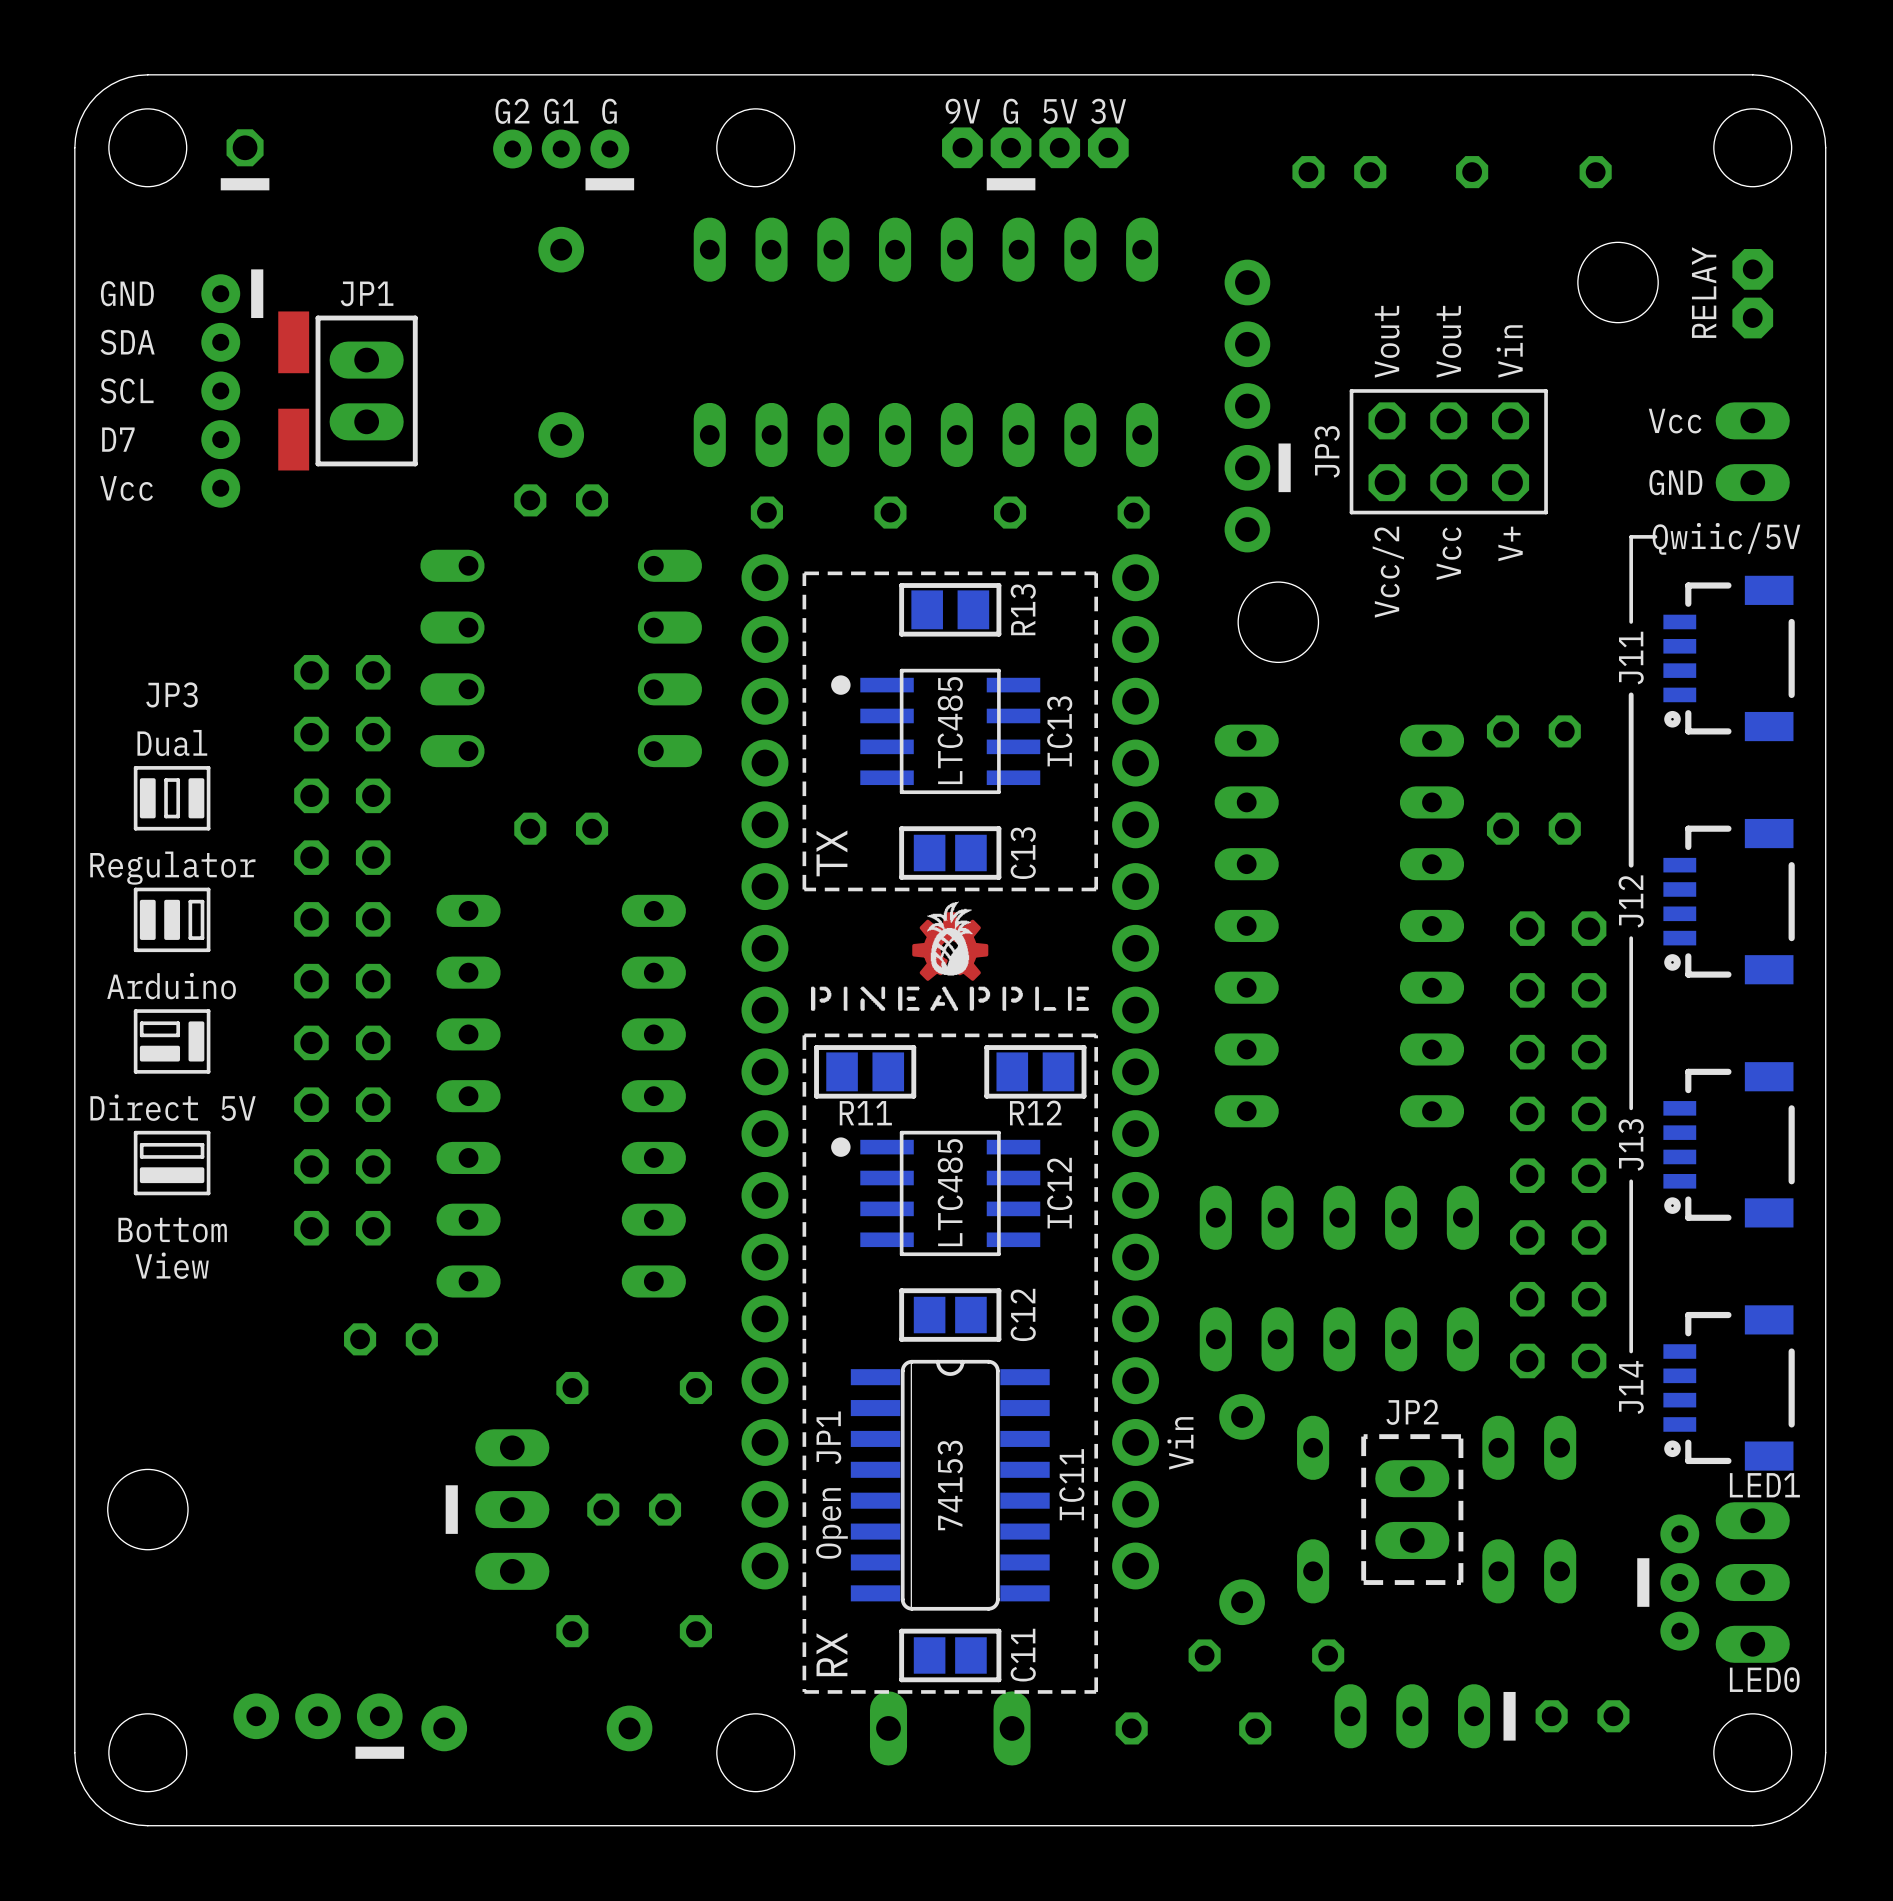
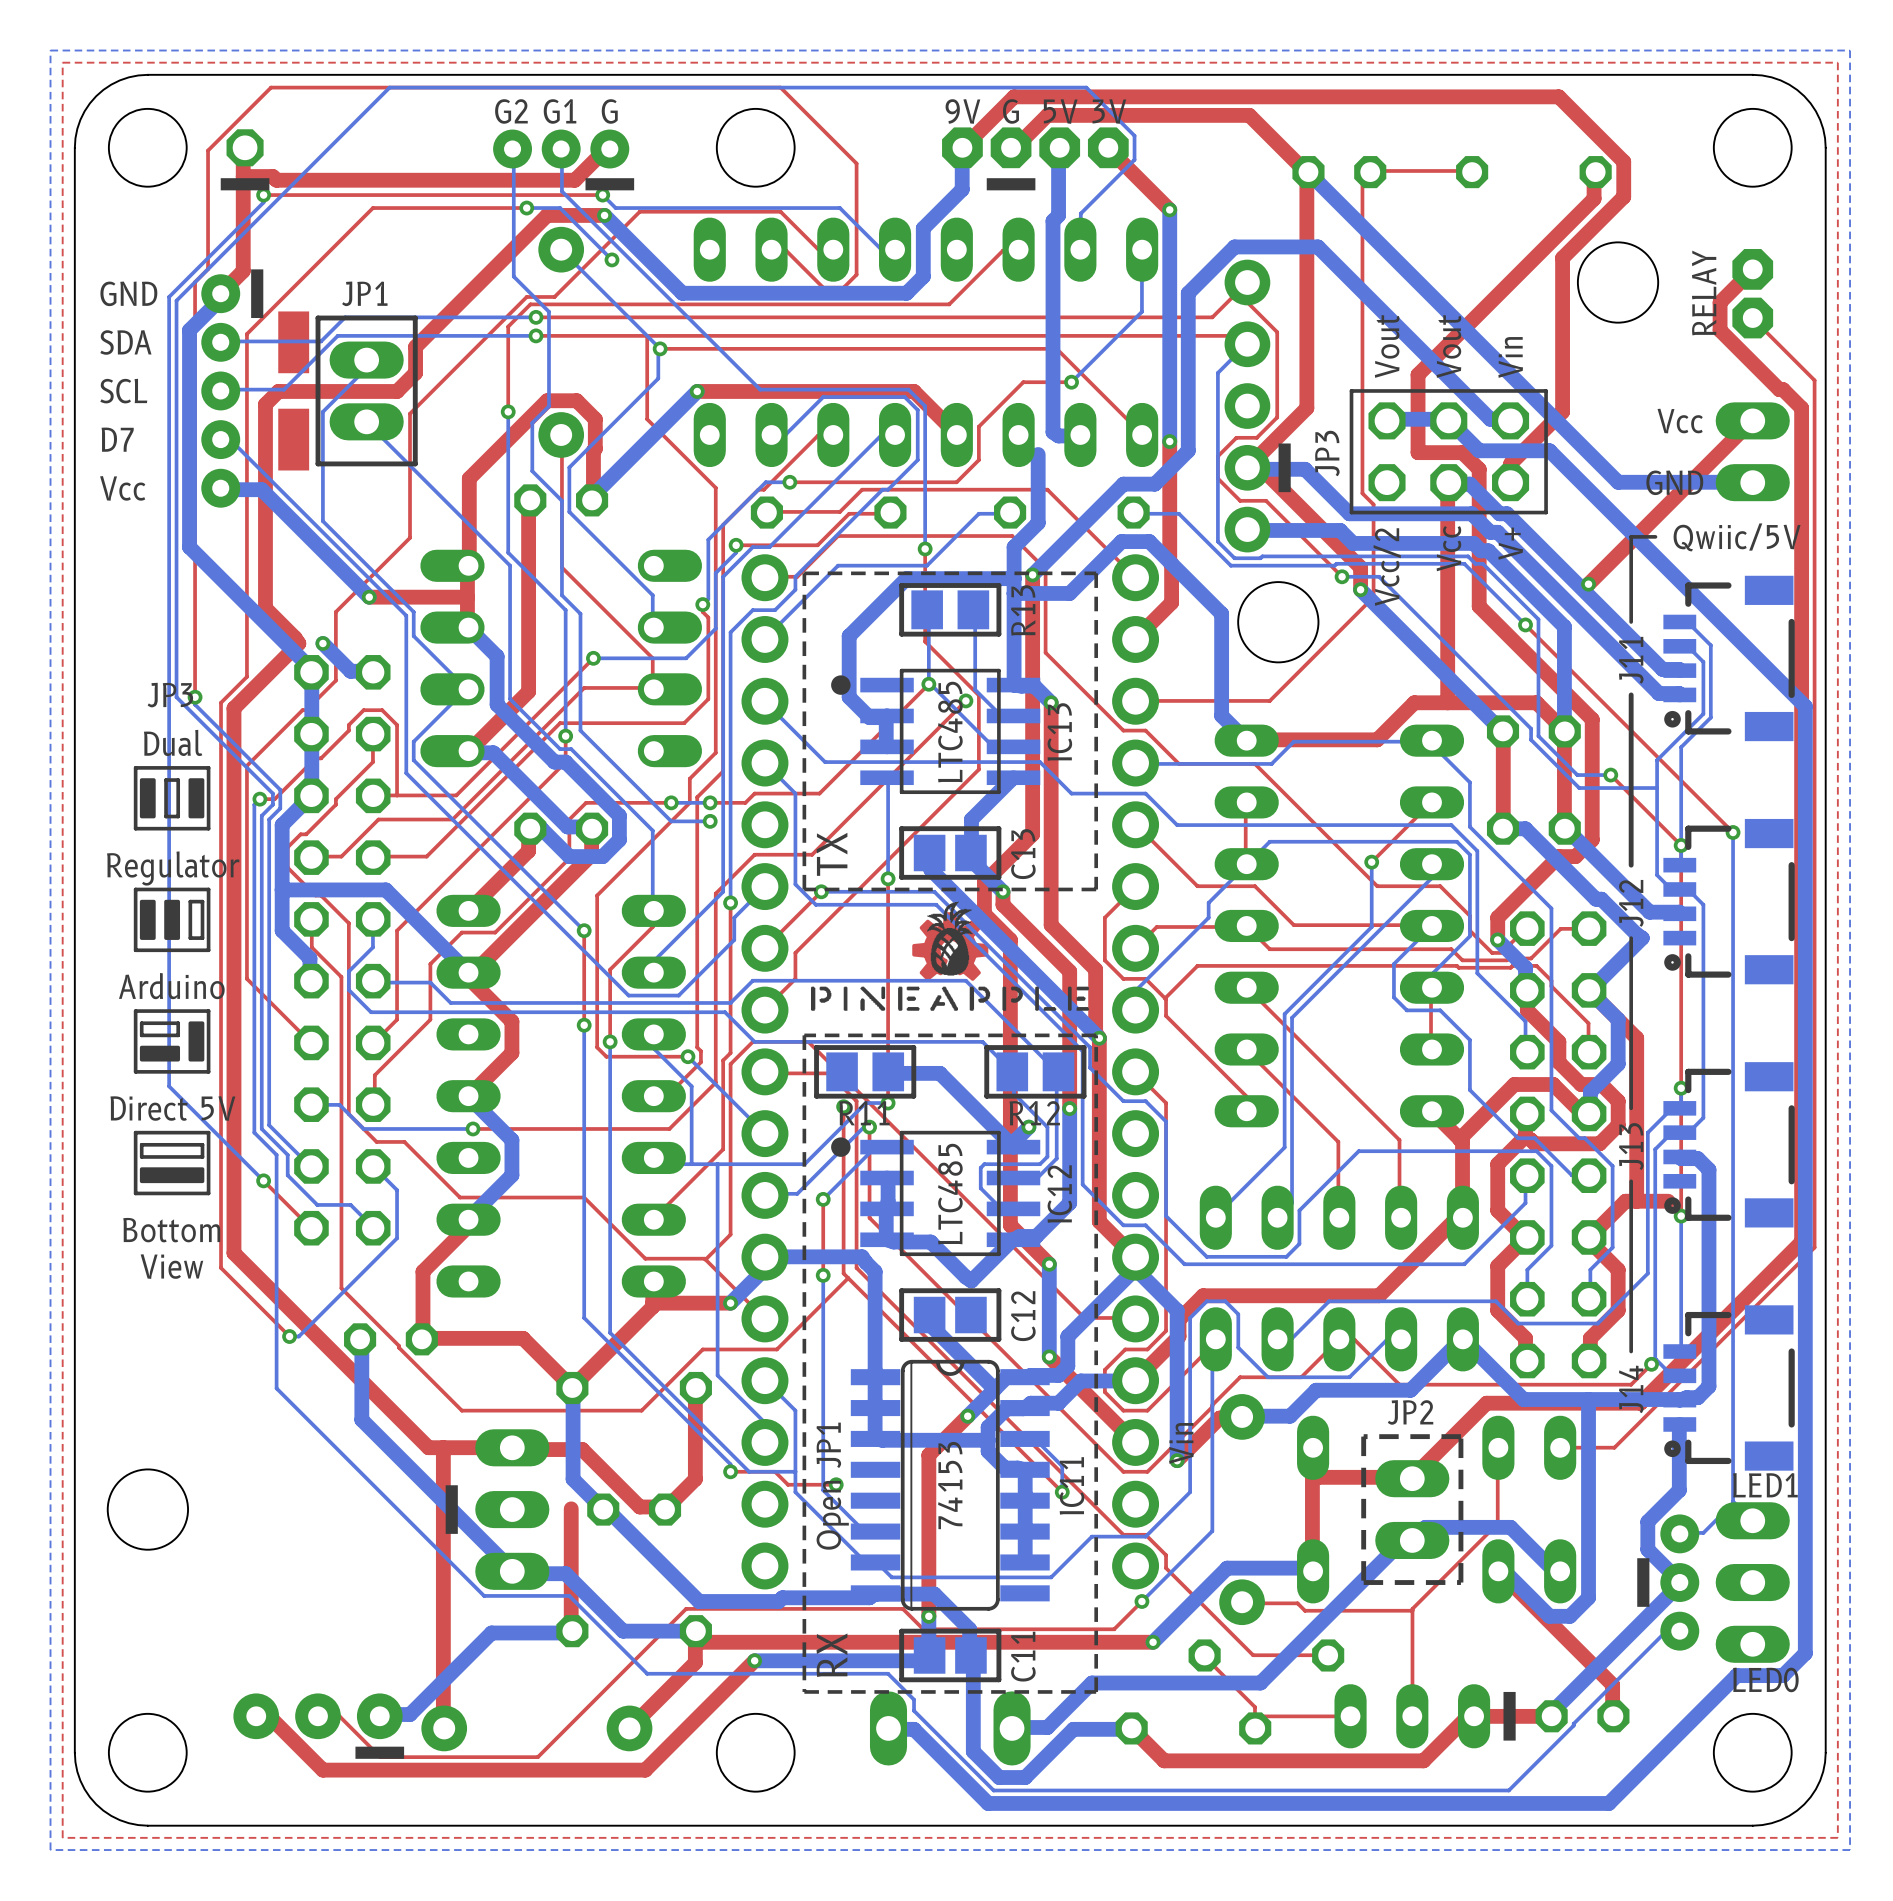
bottom zone outline: none -> (1850, 50) (50, 50) (50, 1850) (1850, 1850) (1850, 50)
top zone outline: none -> (1837, 62) (62, 62) (62, 1837) (1837, 1837) (1837, 62)
top track: none -> (245, 147) (243, 148) (243, 271) (220, 293)
bottom track: none -> (962, 147) (962, 189) (923, 228) (923, 276) (906, 293) (682, 293) (604, 215)
top track: none -> (962, 147) (1014, 96) (1558, 96) (1623, 161) (1623, 196) (1562, 258) (1562, 411) (1510, 463) (1510, 482)
top track: none -> (1011, 147) (1015, 146) (1047, 115) (1249, 115) (1308, 172) (1306, 172) (1306, 408) (1247, 467)
bottom track: none -> (1059, 147) (1058, 215) (1053, 221) (1053, 432) (1058, 435) (1080, 434)
top track: none -> (1108, 147) (1169, 209)
bottom track: none -> (512, 149) (513, 276) (548, 311) (548, 406) (532, 422) (532, 471) (561, 500) (561, 595) (580, 613) (580, 730) (671, 821) (710, 821)
bottom track: none -> (561, 149) (561, 191) (760, 389) (908, 389) (925, 406) (925, 548)
top track: none -> (609, 149) (604, 150) (574, 180) (276, 180) (272, 176) (243, 176)
bottom track: none -> (1308, 172) (1618, 482) (1752, 482)
top track: none -> (1472, 172) (1371, 170) (1362, 180) (1362, 493) (1373, 504) (1373, 597) (1269, 700) (1135, 701)
top track: none -> (1595, 172) (1594, 172) (1594, 198) (1418, 374) (1418, 452) (1462, 452) (1479, 469) (1479, 606) (1592, 719) (1592, 839) (1575, 856) (1558, 856) (1497, 917) (1497, 939)
bottom track: none -> (263, 195) (263, 202) (169, 296) (169, 1086) (263, 1180)
via: none -> (263, 195)
bottom track: none -> (602, 195) (615, 208) (839, 208) (880, 248) (895, 249)
top track: none -> (602, 195) (263, 195)
via: none -> (602, 195)
bottom track: none -> (526, 208) (560, 208) (611, 259)
top track: none -> (526, 208) (372, 208) (246, 334) (246, 676) (221, 702) (221, 1267) (289, 1336)
via: none -> (526, 208)
bottom track: none -> (1169, 209) (1169, 441)
via: none -> (1169, 209)
top track: none -> (604, 215) (547, 215) (415, 347) (415, 372) (397, 391) (278, 391) (265, 404) (265, 608) (298, 643) (233, 708) (233, 1253) (428, 1447) (511, 1447)
via: none -> (604, 215)
bottom track: none -> (561, 249) (660, 348) (658, 348) (658, 378) (569, 467) (569, 511) (652, 595) (653, 627)
top track: none -> (771, 249) (786, 250) (823, 287) (843, 287) (856, 274) (856, 163) (780, 87) (271, 87) (208, 150) (208, 269) (195, 282) (195, 697)
top track: none -> (833, 249) (817, 248) (780, 211) (639, 211) (554, 296) (526, 296) (410, 413) (410, 537) (335, 611) (335, 680) (306, 710) (302, 710) (246, 765) (246, 978) (311, 1042)
top track: none -> (1018, 249) (1002, 250) (949, 304) (530, 304) (508, 326) (508, 411)
bottom track: none -> (1080, 249) (1080, 213) (1134, 159) (1134, 135) (1086, 87) (389, 87) (176, 300) (176, 697) (272, 793) (272, 804) (261, 815) (261, 1128) (287, 1154) (287, 1175) (317, 1204) (350, 1204) (373, 1228)
bottom track: none -> (1142, 249) (1141, 311) (1071, 382)
via: none -> (611, 259)
top track: none -> (1752, 269) (1720, 302) (1720, 330) (1779, 389) (1783, 389) (1801, 408) (1801, 1242) (1640, 1403) (1486, 1403) (1412, 1478) (1317, 1477) (1313, 1447) (1313, 1571)
bottom track: none -> (220, 293) (219, 300) (189, 330) (189, 547) (308, 665) (311, 673) (311, 734)
bottom track: none -> (536, 317) (345, 317) (321, 341) (220, 342)
top track: none -> (536, 317) (1212, 317) (1247, 282) (1238, 293) (1277, 332) (1277, 417) (1256, 437) (1236, 437) (1217, 456) (1217, 478) (1240, 500) (1266, 500) (1342, 576)
via: none -> (536, 317)
top track: none -> (1752, 318) (1814, 380) (1814, 1247) (1614, 1447) (1560, 1447)
bottom track: none -> (536, 335) (337, 335) (284, 389) (220, 390)
top track: none -> (536, 335) (1238, 335) (1247, 344)
via: none -> (536, 335)
top track: none -> (647, 335) (647, 419) (715, 487) (715, 752) (689, 778) (689, 802) (597, 895) (597, 1047) (606, 1056) (687, 1056)
bottom track: none -> (1247, 344) (1217, 372) (1217, 541) (1234, 558) (1260, 558) (1262, 556) (1468, 556) (1475, 563) (1482, 563) (1538, 619) (1538, 736) (1577, 775) (1610, 775)
top track: none -> (660, 348) (1056, 348) (1142, 434)
via: none -> (660, 348)
bottom track: none -> (366, 360) (365, 369) (322, 411) (322, 521) (413, 611) (413, 636) (465, 687) (468, 689) (467, 687) (413, 741) (413, 760) (584, 930)
top track: none -> (1071, 382) (1023, 382) (978, 426) (978, 460) (956, 482) (789, 482)
via: none -> (1071, 382)
bottom track: none -> (697, 391) (593, 495) (592, 500)
top track: none -> (697, 391) (914, 391) (956, 434)
via: none -> (697, 391)
bottom track: none -> (508, 411) (508, 552) (565, 610) (565, 736)
via: none -> (508, 411)
bottom track: none -> (1387, 420) (1388, 419) (1448, 420) (1479, 450) (1549, 450) (1805, 706) (1805, 1653) (1783, 1675) (1736, 1675) (1608, 1803) (988, 1803) (914, 1729) (888, 1728)
bottom track: none -> (1510, 420) (1490, 419) (1317, 246) (1234, 246) (1188, 293) (1188, 450) (1154, 484) (1123, 484) (1032, 574)
top track: none -> (1752, 420) (1588, 584)
bottom track: none -> (366, 421) (510, 565) (510, 699) (560, 749) (571, 749) (652, 830) (653, 910)
top track: none -> (561, 434) (561, 567) (652, 658) (653, 689) (584, 687) (452, 819) (378, 819) (341, 856) (311, 857)
bottom track: none -> (771, 434) (786, 434) (823, 397) (904, 397) (917, 410) (917, 460) (888, 489) (882, 489) (795, 576) (795, 589) (775, 610) (752, 610) (730, 632) (730, 902)
top track: none -> (833, 434) (817, 435) (763, 489) (758, 489) (723, 524) (723, 771) (697, 797) (697, 1047) (700, 1051) (700, 1062) (667, 1095) (653, 1096)
bottom track: none -> (895, 434) (880, 435) (769, 547) (752, 547) (723, 576) (723, 891) (654, 960) (653, 972)
bottom track: none -> (221, 439) (230, 439) (406, 615) (406, 773) (628, 995) (678, 995) (734, 939) (734, 917) (764, 886)
top track: none -> (1169, 441) (1171, 602) (1135, 639)
via: none -> (1169, 441)
bottom track: none -> (1038, 454) (1038, 523) (1014, 547) (1013, 685) (1034, 686) (1051, 702)
bottom track: none -> (1247, 467) (1305, 469) (1349, 513) (1471, 513) (1490, 532) (1497, 532) (1658, 693) (1679, 694)
top track: none -> (1247, 467) (1258, 465) (1360, 567) (1360, 589)
bottom track: none -> (789, 482) (765, 482) (708, 539) (708, 599) (702, 604)
via: none -> (789, 482)
bottom track: none -> (1448, 482) (1469, 484) (1499, 513) (1506, 513) (1662, 669) (1679, 670)
top track: none -> (1448, 482) (1447, 702)
bottom track: none -> (220, 488) (261, 489) (369, 597)
top track: none -> (530, 500) (528, 500) (528, 691) (468, 751)
top track: none -> (592, 500) (595, 419) (576, 400) (547, 400) (469, 478) (468, 627)
top track: none -> (766, 512) (839, 511) (862, 489) (1047, 489) (1135, 577)
top track: none -> (890, 512) (849, 513) (817, 545) (736, 545)
bottom track: none -> (1010, 512) (978, 513) (927, 565) (838, 565) (764, 639)
bottom track: none -> (1133, 512) (1179, 513) (1230, 565) (1464, 563) (1525, 624)
bottom track: none -> (1247, 529) (1340, 530) (1353, 543) (1473, 543) (1481, 550) (1488, 550) (1564, 626) (1564, 731)
bottom track: none -> (736, 545) (736, 552) (715, 573) (715, 628) (686, 658) (593, 658)
via: none -> (736, 545)
top track: none -> (925, 548) (925, 641) (978, 695) (978, 769) (795, 952) (795, 978) (764, 1010)
via: none -> (925, 548)
top track: none -> (1032, 574) (1032, 834) (984, 882) (984, 914) (1010, 939) (1010, 1225) (1049, 1264)
via: none -> (1032, 574)
bottom track: none -> (1342, 576) (1379, 576) (1531, 728) (1531, 739) (1579, 788) (1657, 788)
via: none -> (1342, 576)
top track: none -> (764, 577) (797, 576) (838, 536) (1012, 536) (1045, 569) (1045, 652) (1123, 730) (1145, 730) (1179, 763) (1254, 763) (1377, 886) (1440, 886) (1469, 915) (1469, 930) (1492, 952) (1503, 952) (1527, 928)
bottom track: none -> (1014, 578) (906, 578) (849, 636) (849, 697) (869, 717) (887, 715) (887, 746)
via: none -> (1588, 584)
bottom track: none -> (1360, 589) (1503, 731)
via: none -> (1360, 589)
bottom track: none -> (1014, 593) (1069, 593) (1121, 541) (1149, 541) (1221, 613) (1221, 715) (1246, 740)
via: none -> (369, 597)
top track: none -> (467, 597) (369, 597)
top track: none -> (702, 604) (702, 611) (708, 617) (708, 699) (684, 723) (560, 723) (426, 856) (373, 857)
via: none -> (702, 604)
bottom track: none -> (927, 609) (928, 610) (928, 682) (991, 745) (1013, 746)
bottom track: none -> (973, 609) (975, 610) (975, 689) (1001, 715) (1013, 715)
bottom track: none -> (1679, 621) (1688, 623) (1710, 645) (1710, 717) (1681, 747) (1679, 865)
top track: none -> (1525, 624) (1733, 832)
via: none -> (1525, 624)
bottom track: none -> (468, 627) (497, 656) (497, 704) (554, 762) (565, 762) (619, 815) (619, 839) (602, 856) (569, 856) (541, 828) (530, 828)
bottom track: none -> (322, 643) (350, 671) (373, 672)
via: none -> (322, 643)
bottom track: none -> (1679, 646) (1688, 647) (1703, 662) (1703, 713) (1657, 760) (1657, 875) (1670, 888) (1688, 889) (1703, 904) (1703, 1117) (1690, 1130) (1681, 1130) (1679, 1132)
top track: none -> (593, 658) (456, 795) (373, 795)
via: none -> (593, 658)
top track: none -> (928, 684) (819, 793) (754, 793) (745, 802) (710, 802)
via: none -> (928, 684)
bottom track: none -> (195, 697) (195, 704) (280, 789) (280, 808) (269, 819) (269, 1125) (311, 1166)
via: none -> (195, 697)
top track: none -> (965, 700) (812, 854) (754, 854) (715, 893) (715, 1082) (669, 1128) (473, 1128)
via: none -> (965, 700)
bottom track: none -> (764, 701) (825, 762) (1040, 762) (1071, 793) (1145, 793) (1177, 825) (1451, 825) (1477, 851) (1477, 973) (1525, 1021) (1525, 1051) (1527, 1052)
top track: none -> (1051, 702) (1051, 925) (1095, 969) (1095, 1032) (1099, 1038) (1099, 1221) (1135, 1257)
via: none -> (1051, 702)
top track: none -> (1503, 731) (1503, 828)
bottom track: none -> (311, 734) (311, 795) (282, 825) (282, 930) (309, 958) (311, 981)
top track: none -> (372, 734) (372, 762) (335, 799) (335, 804) (306, 834) (300, 834) (287, 847) (287, 867) (315, 895) (321, 895) (348, 923) (348, 1114) (376, 1141) (404, 1141) (460, 1197) (584, 1197) (645, 1258) (704, 1258) (764, 1318)
top track: none -> (565, 736) (565, 762) (397, 930) (397, 1019) (373, 1042)
via: none -> (565, 736)
top track: none -> (1246, 740) (1377, 739) (1414, 702) (1536, 702) (1564, 731) (1564, 828)
bottom track: none -> (468, 751) (469, 752) (493, 752) (567, 826) (591, 826) (592, 828)
bottom track: none -> (764, 763) (795, 793) (795, 884) (815, 904) (936, 904) (1082, 1051) (1082, 1184) (1123, 1225) (1145, 1225) (1184, 1264) (1464, 1264) (1525, 1203) (1525, 1177) (1527, 1175)
bottom track: none -> (1135, 763) (1271, 763) (1293, 741) (1432, 740) (1431, 743) (1469, 782) (1469, 826) (1551, 908) (1551, 1110) (1579, 1138) (1584, 1138) (1612, 1166) (1612, 1247) (1590, 1269) (1589, 1299)
top track: none -> (1610, 775) (1681, 845) (1681, 1216)
via: none -> (1610, 775)
bottom track: none -> (887, 777) (888, 878)
bottom track: none -> (1013, 777) (971, 819) (971, 860) (1002, 891)
top track: none -> (397, 795) (397, 725) (382, 710) (363, 710) (348, 725) (348, 730) (321, 758) (315, 758) (274, 799) (259, 799)
bottom track: none -> (259, 799) (254, 804) (254, 1132) (276, 1154) (276, 1388) (484, 1595) (569, 1595) (647, 1673) (888, 1673) (914, 1699) (914, 1710) (993, 1790) (1508, 1790) (1664, 1632) (1679, 1632) (1679, 1631)
via: none -> (259, 799)
top track: none -> (671, 802) (586, 802) (569, 819) (569, 858) (495, 932) (461, 932) (430, 964) (430, 1019) (374, 1075) (373, 1104)
via: none -> (671, 802)
bottom track: none -> (710, 802) (671, 802)
via: none -> (710, 802)
top track: none -> (1246, 802) (1246, 864)
top track: none -> (1432, 802) (1371, 862)
via: none -> (710, 821)
top track: none -> (1135, 824) (1197, 886) (1254, 886) (1293, 925) (1432, 925)
top track: none -> (530, 828) (528, 828) (528, 851) (468, 910)
top track: none -> (591, 828) (591, 854) (474, 971) (468, 972) (469, 978) (511, 1021) (511, 1053) (468, 1096)
bottom track: none -> (1503, 828) (1525, 828) (1595, 899) (1601, 899) (1642, 938) (1589, 990) (1618, 1019) (1618, 1064) (1590, 1091) (1589, 1113)
bottom track: none -> (1564, 828) (1649, 912) (1679, 912) (1679, 913)
bottom track: none -> (1733, 832) (1733, 1501) (1752, 1520) (1733, 1503) (1703, 1532) (1679, 1533)
via: none -> (1733, 832)
via: none -> (1681, 845)
bottom track: none -> (929, 853) (930, 869) (1099, 1038)
bottom track: none -> (1371, 862) (1371, 927) (1284, 1014) (1284, 1147) (1215, 1217)
via: none -> (1371, 862)
bottom track: none -> (1432, 864) (1431, 878) (1292, 1017) (1292, 1203) (1277, 1217)
top track: none -> (888, 878) (888, 1103)
via: none -> (888, 878)
top track: none -> (1135, 886) (1104, 917) (1104, 960) (1123, 978) (1145, 978) (1166, 999) (1166, 1015) (1245, 1095) (1246, 1111)
bottom track: none -> (282, 889) (385, 889) (468, 972)
bottom track: none -> (821, 891) (934, 891) (1090, 1047) (1090, 1067) (1123, 1101) (1145, 1101) (1166, 1121) (1166, 1216) (1206, 1256) (1286, 1256) (1299, 1243) (1299, 1210) (1358, 1151) (1536, 1151) (1551, 1166) (1551, 1245) (1527, 1269) (1527, 1299)
top track: none -> (821, 891) (764, 948)
via: none -> (821, 891)
top track: none -> (1002, 891) (1002, 904) (1069, 971) (1069, 1108)
via: none -> (1002, 891)
top track: none -> (730, 902) (730, 1053) (723, 1060) (723, 1149) (653, 1219)
via: none -> (730, 902)
top track: none -> (653, 910) (652, 927) (610, 969) (610, 1041)
top track: none -> (311, 919) (311, 947) (341, 977) (341, 1288) (461, 1410) (641, 1410) (702, 1349) (776, 1349) (848, 1278)
bottom track: none -> (372, 919) (372, 947) (348, 971) (348, 990) (371, 1012) (725, 1012) (754, 1041) (982, 1041) (1012, 1071)
bottom track: none -> (1432, 925) (1393, 964) (1393, 997) (1406, 1010) (1440, 1010) (1469, 1040) (1469, 1090) (1518, 1138) (1534, 1138) (1571, 1175) (1589, 1175)
top track: none -> (1589, 928) (1560, 928) (1531, 958) (1508, 958) (1506, 960) (1462, 960) (1451, 949) (1269, 949) (1246, 925) (1156, 927) (1135, 948)
top track: none -> (584, 930) (584, 1025)
via: none -> (584, 930)
bottom track: none -> (1497, 939) (1525, 967) (1525, 990) (1527, 990)
via: none -> (1497, 939)
bottom track: none -> (373, 981) (430, 982) (450, 1002) (730, 1002) (752, 980) (965, 980) (1058, 1071) (1056, 1073) (1056, 1158) (1038, 1177) (1013, 1178)
top track: none -> (1246, 987) (1399, 1140) (1399, 1216) (1401, 1217)
bottom track: none -> (1432, 987) (1432, 973) (1469, 936) (1469, 854) (1456, 841) (1269, 841) (1208, 902) (1208, 917) (1136, 990) (1135, 1010)
top track: none -> (1432, 987) (1432, 1049)
top track: none -> (1527, 990) (1527, 1010) (1558, 1041) (1558, 1062) (1581, 1084) (1601, 1084) (1618, 1101) (1618, 1125) (1599, 1143) (1534, 1143) (1525, 1136)
top track: none -> (1589, 990) (1636, 1038) (1636, 1201)
top track: none -> (1165, 998) (1197, 965) (1456, 965) (1458, 967) (1536, 965) (1551, 980) (1551, 986) (1588, 1023) (1589, 1052)
bottom track: none -> (584, 1025) (584, 1317) (730, 1464) (730, 1471)
via: none -> (584, 1025)
bottom track: none -> (653, 1034) (654, 1049) (691, 1086) (691, 1164)
via: none -> (1099, 1038)
bottom track: none -> (610, 1041) (610, 1332) (749, 1471) (795, 1471)
via: none -> (610, 1041)
top track: none -> (1246, 1049) (1338, 1141) (1339, 1217)
bottom track: none -> (687, 1056) (764, 1133)
via: none -> (687, 1056)
top track: none -> (764, 1071) (765, 1073) (828, 1073) (856, 1101) (856, 1267) (1123, 1534) (1145, 1534) (1166, 1555) (1166, 1568) (1253, 1655) (1328, 1655)
bottom track: none -> (888, 1071) (939, 1073) (1013, 1147) (1015, 1140) (1028, 1127)
bottom track: none -> (1012, 1071) (1014, 1073) (1014, 1093) (1047, 1127) (1047, 1156) (1040, 1164) (984, 1164) (980, 1167) (980, 1188) (1001, 1208) (1013, 1208)
top track: none -> (1135, 1071) (1166, 1103) (1166, 1330) (1147, 1349) (1125, 1349) (1104, 1369) (1104, 1392) (1123, 1410) (1147, 1410) (1214, 1343) (1215, 1339)
bottom track: none -> (1681, 1088) (1681, 1106) (1671, 1108) (1647, 1132) (1647, 1273) (1597, 1323) (1518, 1323) (1495, 1301) (1329, 1301) (1292, 1338) (1277, 1339)
via: none -> (1681, 1088)
bottom track: none -> (468, 1096) (511, 1140) (511, 1175) (468, 1219)
bottom track: none -> (888, 1103) (865, 1103) (804, 1164) (660, 1164) (653, 1157)
via: none -> (888, 1103)
bottom track: none -> (311, 1104) (339, 1104) (363, 1128) (473, 1128)
top track: none -> (843, 1106) (843, 1273) (1062, 1492)
via: none -> (843, 1106)
bottom track: none -> (1069, 1108) (1069, 1203) (1036, 1236) (1019, 1236) (1012, 1240) (971, 1280) (930, 1242) (893, 1242) (887, 1239) (887, 1178)
via: none -> (1069, 1108)
top track: none -> (1432, 1111) (1462, 1141) (1462, 1217) (1453, 1221) (1379, 1295) (1203, 1295) (1179, 1319) (1179, 1336) (1135, 1380)
top track: none -> (1589, 1113) (1581, 1112) (1553, 1084) (1514, 1084) (1459, 1139)
bottom track: none -> (869, 1127) (863, 1127) (797, 1193) (765, 1193) (764, 1195)
top track: none -> (869, 1127) (869, 1217) (1123, 1471) (1147, 1471) (1240, 1377) (1301, 1377) (1339, 1339) (1355, 1340) (1399, 1384) (1631, 1384) (1651, 1364)
via: none -> (869, 1127)
via: none -> (1028, 1127)
via: none -> (473, 1128)
bottom track: none -> (1679, 1132) (1671, 1132) (1655, 1149) (1655, 1358) (1671, 1375) (1679, 1375)
top track: none -> (1525, 1136) (1497, 1164) (1497, 1210) (1527, 1237) (1497, 1266) (1497, 1310) (1525, 1338) (1525, 1360) (1527, 1360)
bottom track: none -> (887, 1147) (875, 1147) (823, 1199)
bottom track: none -> (1679, 1156) (1681, 1158) (1697, 1158) (1708, 1169) (1708, 1386) (1697, 1397) (1686, 1397) (1679, 1400) (1523, 1399) (1462, 1339) (1410, 1390) (1316, 1390) (1290, 1416) (1242, 1416)
bottom track: none -> (717, 1164) (717, 1375) (763, 1421) (764, 1442)
bottom track: none -> (373, 1166) (397, 1190) (397, 1238) (298, 1336) (289, 1336)
top track: none -> (263, 1180) (311, 1228)
via: none -> (263, 1180)
top track: none -> (823, 1199) (823, 1275)
via: none -> (823, 1199)
top track: none -> (1668, 1201) (1625, 1201) (1589, 1237) (1592, 1243) (1618, 1269) (1618, 1310) (1590, 1338) (1589, 1360)
bottom track: none -> (1681, 1216) (1679, 1351)
via: none -> (1681, 1216)
top track: none -> (468, 1219) (467, 1227) (422, 1271) (421, 1339) (523, 1338) (572, 1387) (652, 1306) (653, 1281)
top track: none -> (705, 1259) (730, 1234) (730, 1064) (752, 1041) (808, 1041) (1084, 1317) (1135, 1318)
bottom track: none -> (1049, 1264) (1049, 1356)
via: none -> (1049, 1264)
bottom track: none -> (823, 1275) (823, 1490) (863, 1531) (875, 1531)
via: none -> (823, 1275)
bottom track: none -> (730, 1303) (763, 1269) (765, 1256) (862, 1256) (875, 1271) (875, 1377)
top track: none -> (730, 1303) (652, 1303)
via: none -> (730, 1303)
bottom track: none -> (929, 1315) (930, 1325) (994, 1389)
via: none -> (289, 1336)
bottom track: none -> (360, 1339) (361, 1340) (361, 1419) (512, 1571) (519, 1573) (565, 1573) (623, 1631) (695, 1631)
bottom track: none -> (1215, 1339) (1212, 1342) (1212, 1531) (1141, 1601)
bottom track: none -> (1401, 1339) (1386, 1340) (1349, 1377) (1267, 1377) (1238, 1347) (1238, 1314) (1225, 1301) (1206, 1301) (1190, 1317) (1190, 1492) (1145, 1536) (1091, 1536) (1051, 1577) (891, 1577) (875, 1560) (863, 1560) (795, 1492) (795, 1410) (764, 1380)
top track: none -> (1049, 1356) (1135, 1442)
via: none -> (1049, 1356)
via: none -> (1651, 1364)
bottom track: none -> (875, 1377) (875, 1438) (988, 1440)
bottom track: none -> (1135, 1380) (1080, 1380) (1058, 1403) (1030, 1403) (1023, 1408) (1006, 1408) (988, 1427) (988, 1451) (1004, 1468) (1025, 1469)
bottom track: none -> (572, 1387) (573, 1479) (603, 1509) (610, 1512) (699, 1601) (778, 1601) (782, 1597) (869, 1597) (875, 1593) (934, 1594) (969, 1629) (969, 1655) (973, 1662) (973, 1751) (999, 1777) (1025, 1777) (1073, 1729) (1131, 1728)
top track: none -> (695, 1387) (695, 1479) (665, 1509) (658, 1506) (639, 1506) (582, 1449) (519, 1449) (512, 1447)
bottom track: none -> (1588, 1399) (1588, 1597) (1569, 1616) (1549, 1616) (1505, 1571) (1498, 1571)
bottom track: none -> (967, 1416) (1006, 1377) (1058, 1375) (1067, 1366) (1067, 1336) (1134, 1269) (1135, 1257) (1140, 1273) (1177, 1310) (1177, 1460)
top track: none -> (967, 1416) (928, 1455) (928, 1616)
via: none -> (967, 1416)
top track: none -> (1242, 1416) (1219, 1418) (1177, 1460)
bottom track: none -> (1679, 1424) (1679, 1490) (1647, 1521) (1647, 1549) (1679, 1582) (1553, 1710) (1551, 1716)
bottom track: none -> (1025, 1438) (1036, 1440) (1062, 1466) (1062, 1492)
top track: none -> (443, 1447) (444, 1728)
top track: none -> (1498, 1447) (1497, 1523) (1412, 1608) (1412, 1716)
via: none -> (1177, 1460)
bottom track: none -> (1025, 1469) (1025, 1562)
top track: none -> (730, 1471) (775, 1471) (788, 1484) (836, 1484)
via: none -> (730, 1471)
via: none -> (836, 1484)
via: none -> (1062, 1492)
top track: none -> (571, 1508) (572, 1631)
bottom track: none -> (1412, 1540) (1425, 1527) (1510, 1527) (1553, 1569) (1560, 1571)
bottom track: none -> (1412, 1540) (1401, 1542) (1260, 1683) (1091, 1683) (1047, 1727) (1012, 1728)
bottom track: none -> (1313, 1571) (1310, 1568) (1227, 1568) (1153, 1642)
top track: none -> (1498, 1571) (1612, 1684) (1613, 1716)
top track: none -> (1141, 1601) (1114, 1629) (923, 1629) (902, 1608) (686, 1608) (537, 1757) (380, 1757) (339, 1716) (318, 1716)
via: none -> (1141, 1601)
top track: none -> (1242, 1602) (1297, 1603) (1305, 1610) (1412, 1610)
bottom track: none -> (928, 1616) (929, 1655) (925, 1660) (754, 1660)
via: none -> (928, 1616)
bottom track: none -> (572, 1631) (571, 1632) (491, 1632) (410, 1714) (380, 1714) (379, 1716)
top track: none -> (1153, 1642) (700, 1642) (695, 1631) (695, 1662) (629, 1728)
via: none -> (1153, 1642)
top track: none -> (1204, 1655) (1254, 1707) (1254, 1727) (1255, 1728) (1254, 1716) (1349, 1716) (1350, 1716)
top track: none -> (754, 1660) (645, 1770) (322, 1770) (269, 1716) (256, 1716)
via: none -> (754, 1660)
top track: none -> (1551, 1716) (1474, 1716) (1464, 1720) (1423, 1760) (1164, 1760) (1131, 1728)

